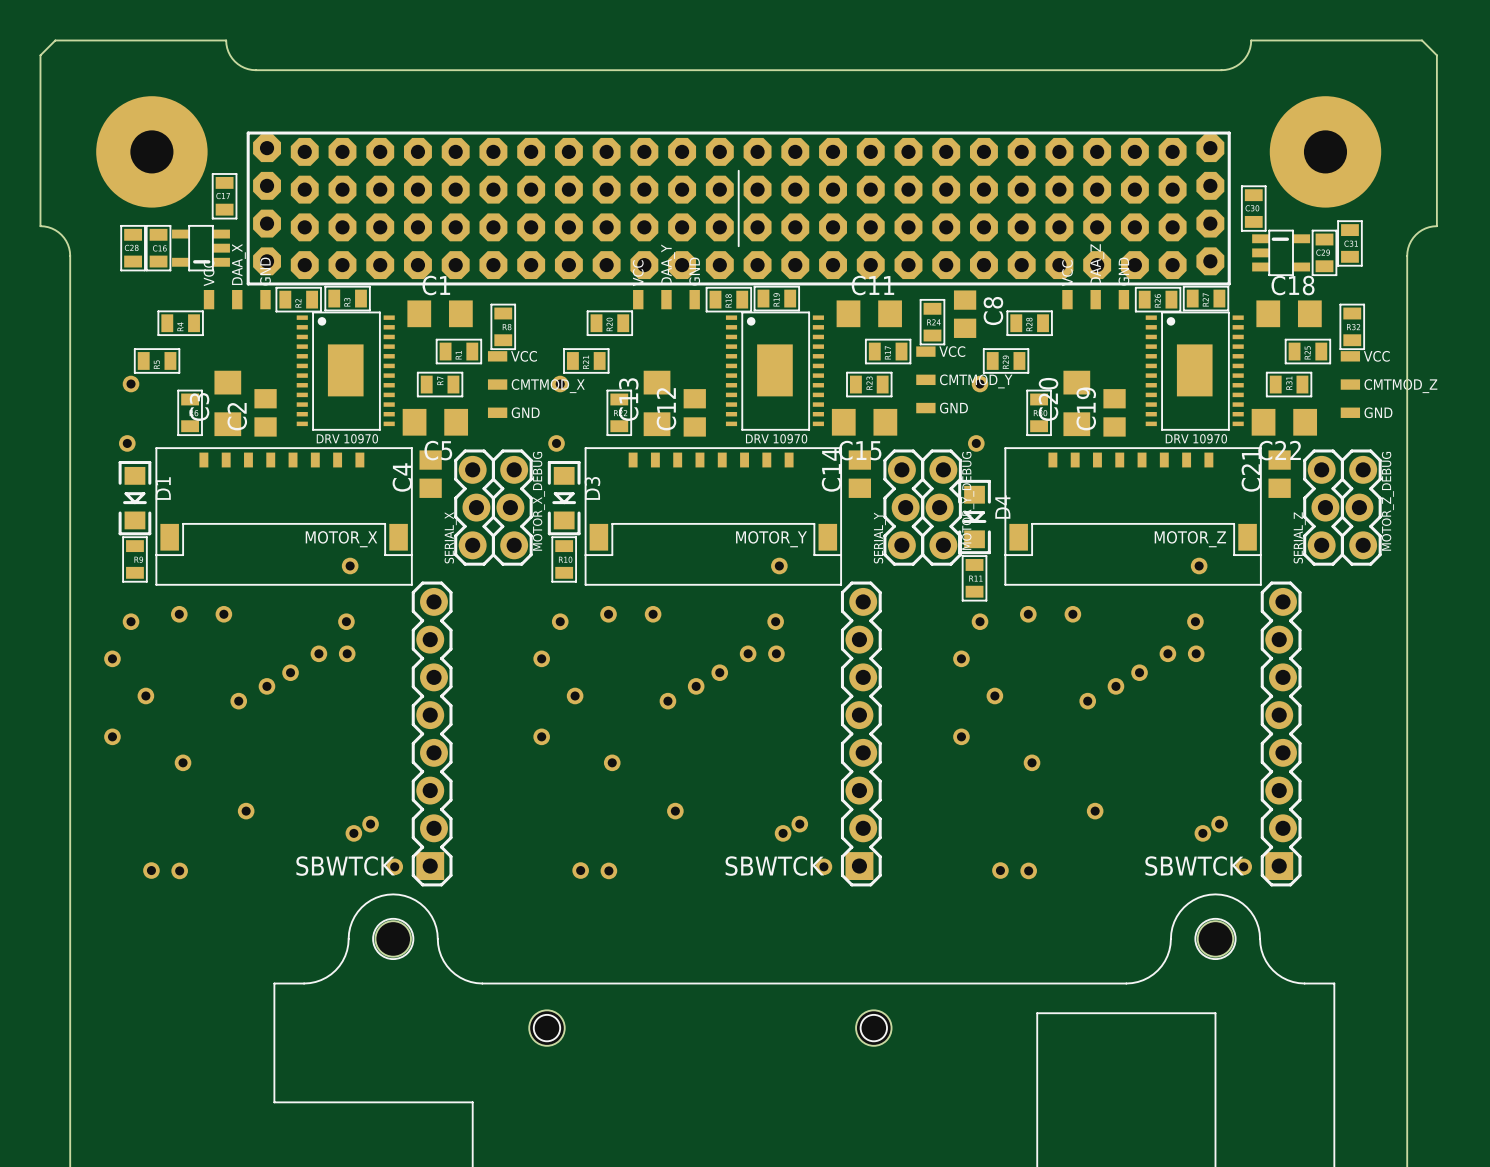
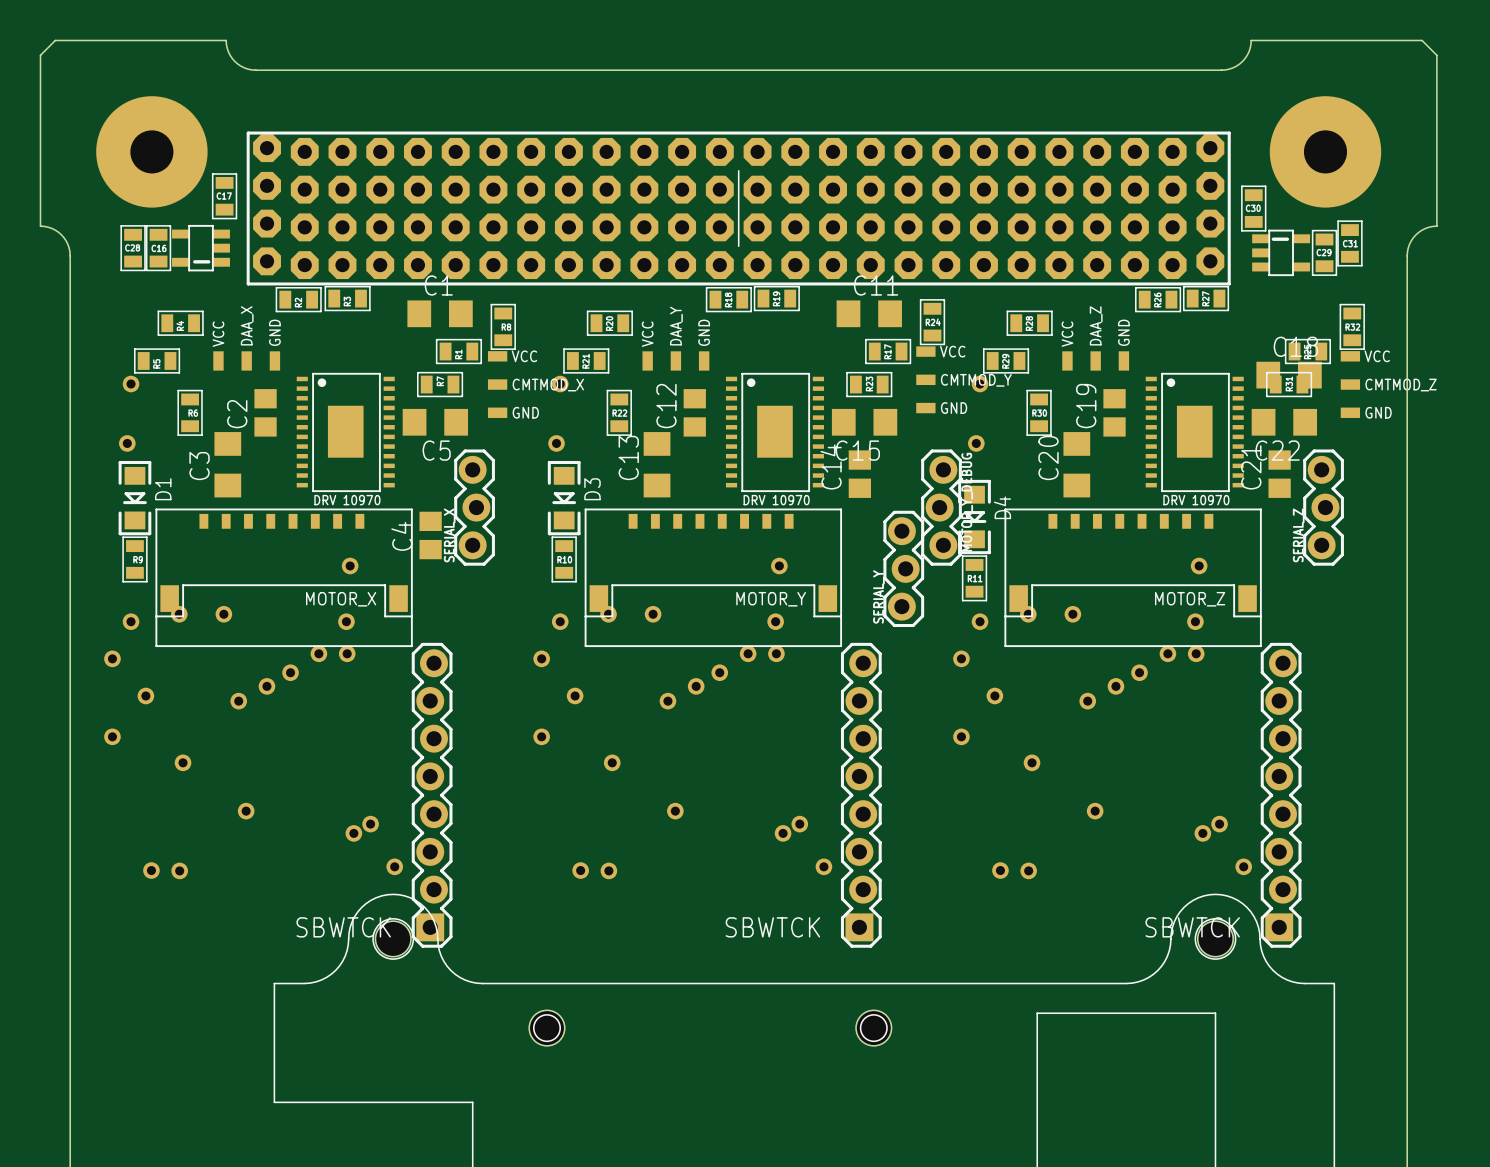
DAA_X position: (237, 299) -> (246, 360)
DAA_Y position: (666, 299) -> (675, 360)
DAA_Z position: (1095, 299) -> (1095, 360)
C18 position: (1289, 313) -> (1289, 375)
C8: (965, 314) -> none
part position: (345, 371) -> (345, 432)
part position: (774, 371) -> (774, 432)
part position: (1194, 371) -> (1194, 432)
C3 position: (227, 403) -> (227, 464)
C13 position: (657, 403) -> (657, 464)
C20 position: (1076, 403) -> (1076, 464)
C4 position: (430, 474) -> (430, 535)
MOTOR_X_DEBUG: (512, 507) -> none
SERIAL_Y position: (903, 507) -> (903, 568)
MOTOR_Z_DEBUG: (1361, 507) -> none
MOTOR_X position: (284, 516) -> (284, 577)
MOTOR_Y position: (713, 516) -> (713, 577)
MOTOR_Z position: (1133, 516) -> (1133, 577)
part position: (432, 733) -> (432, 795)
part position: (861, 733) -> (861, 795)
part position: (1281, 733) -> (1281, 795)

